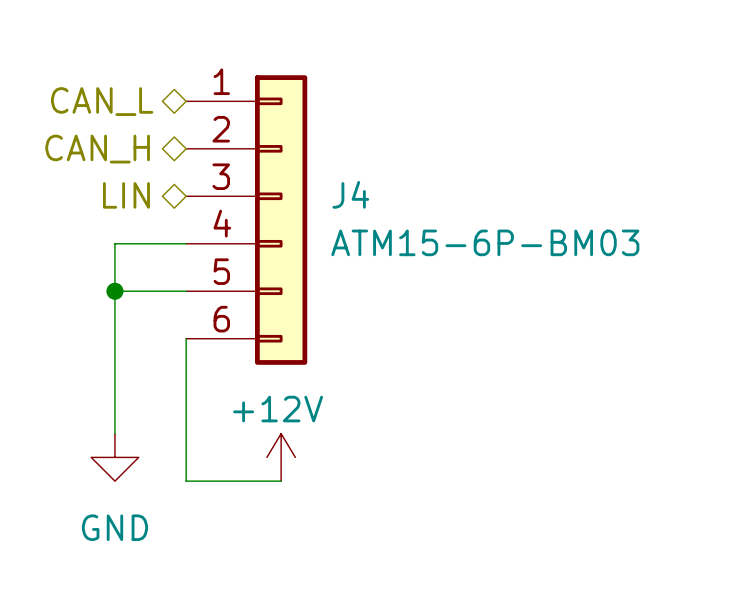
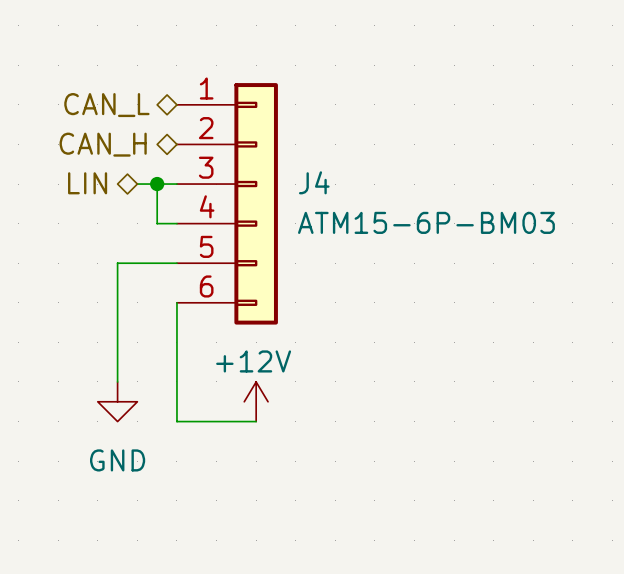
hierarchical label position: LIN (126, 195) -> LIN (87, 183)
wire: none -> (137, 184) (176, 184)
wire: (162, 243) (114, 243) (114, 291) -> (157, 223) (157, 184)
junction position: (114, 291) -> (157, 184)

